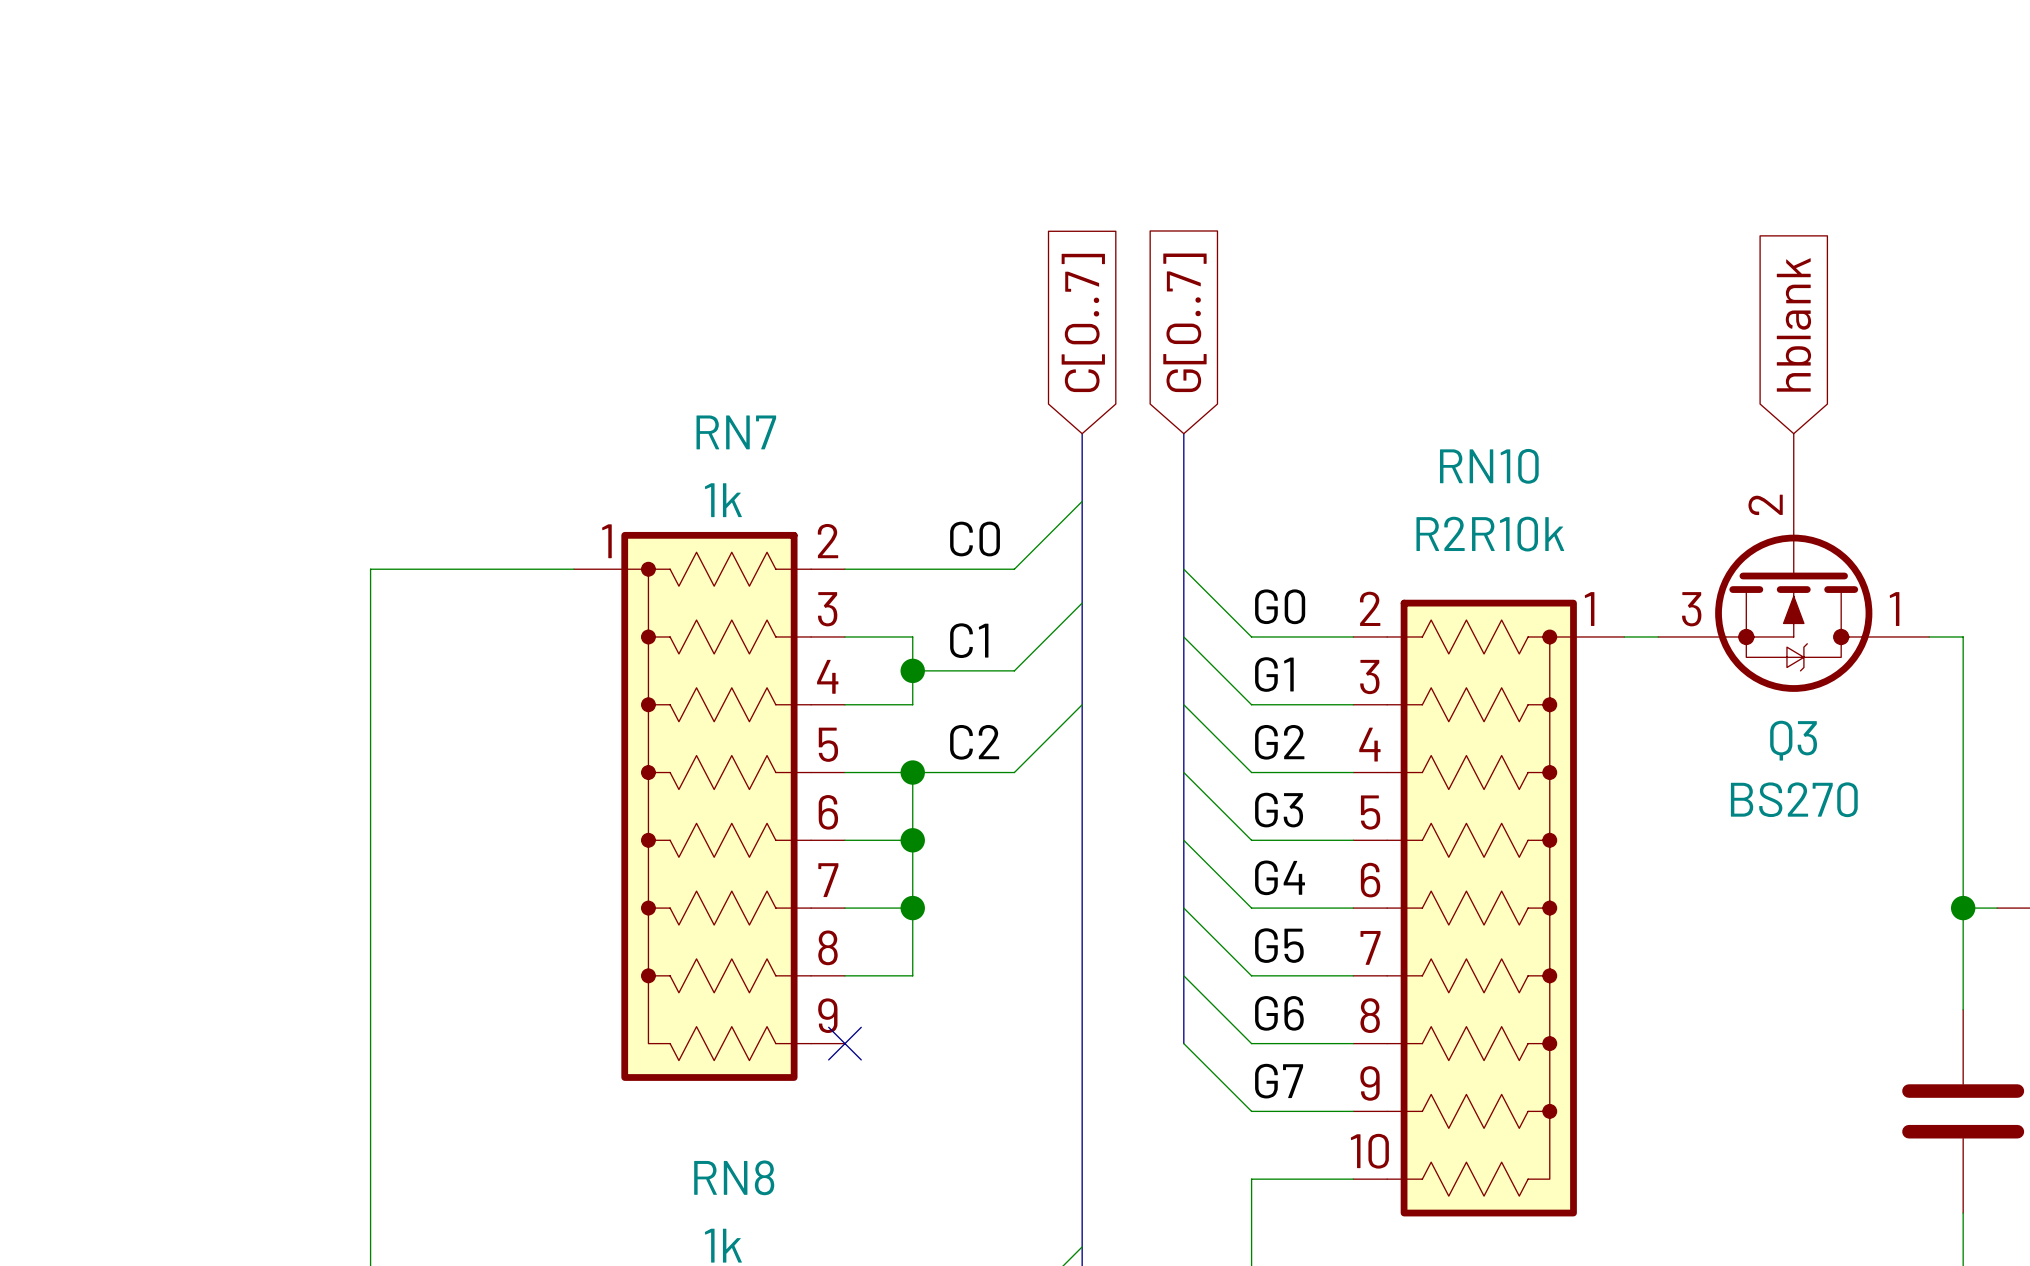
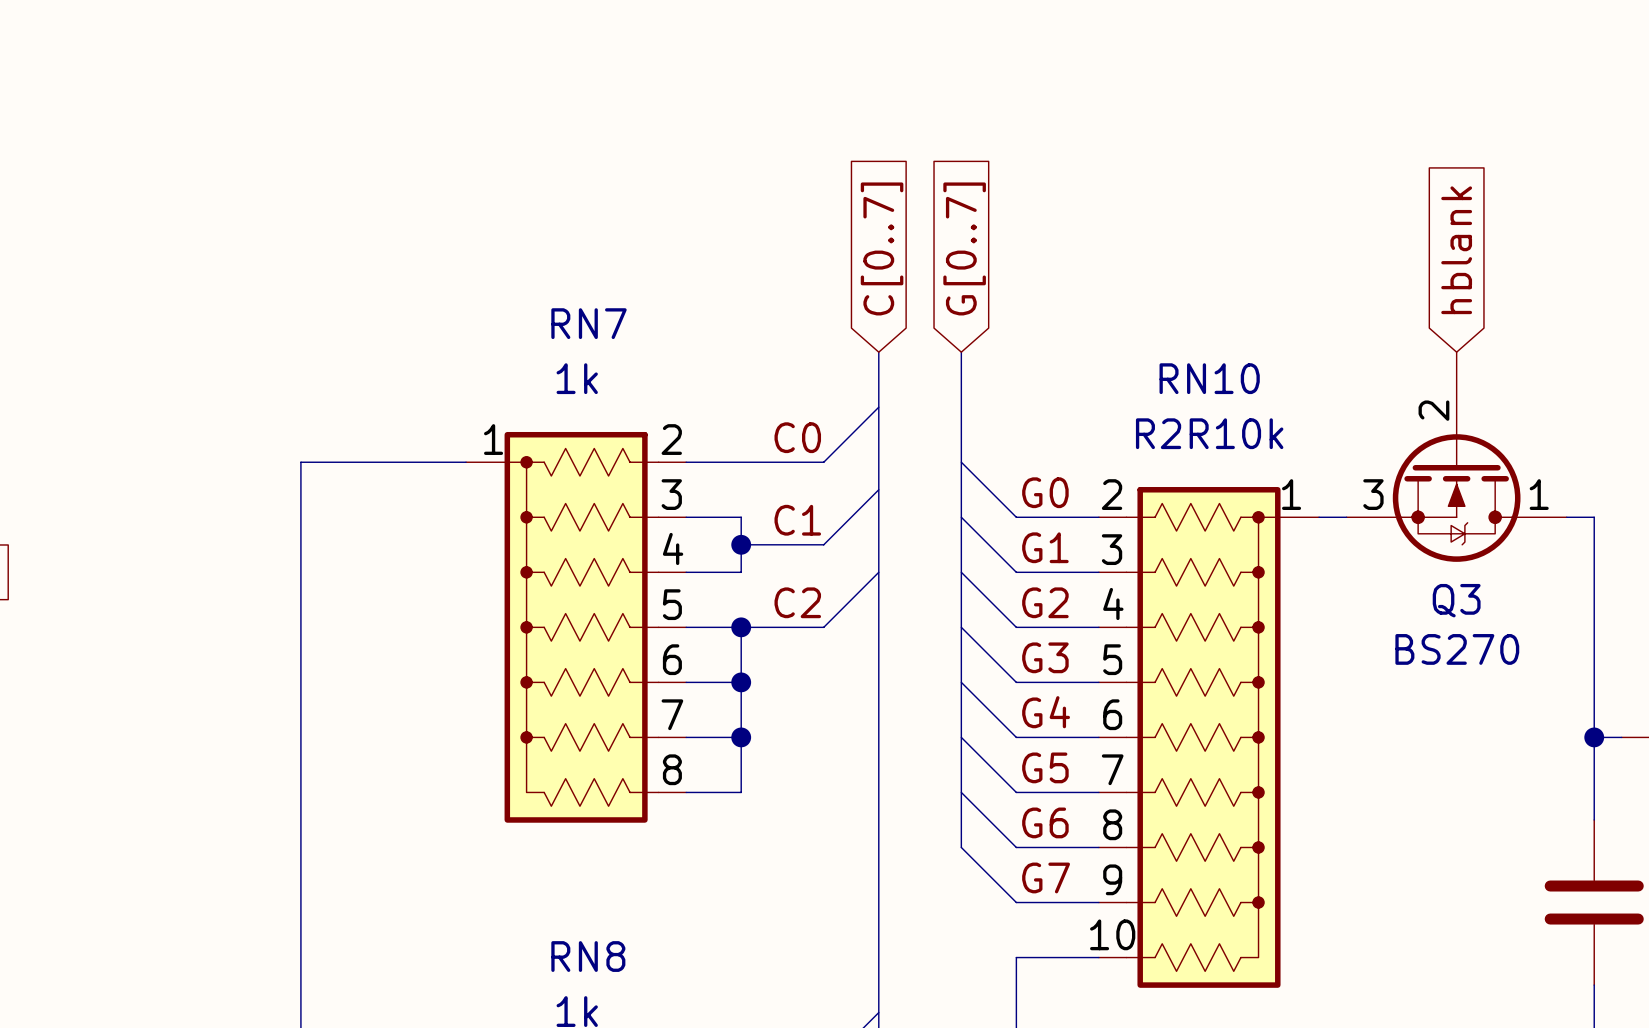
RN7 symbol: [573, 531, 845, 1081] -> [466, 431, 687, 823]
no-connect mark: (844, 1043) -> none

